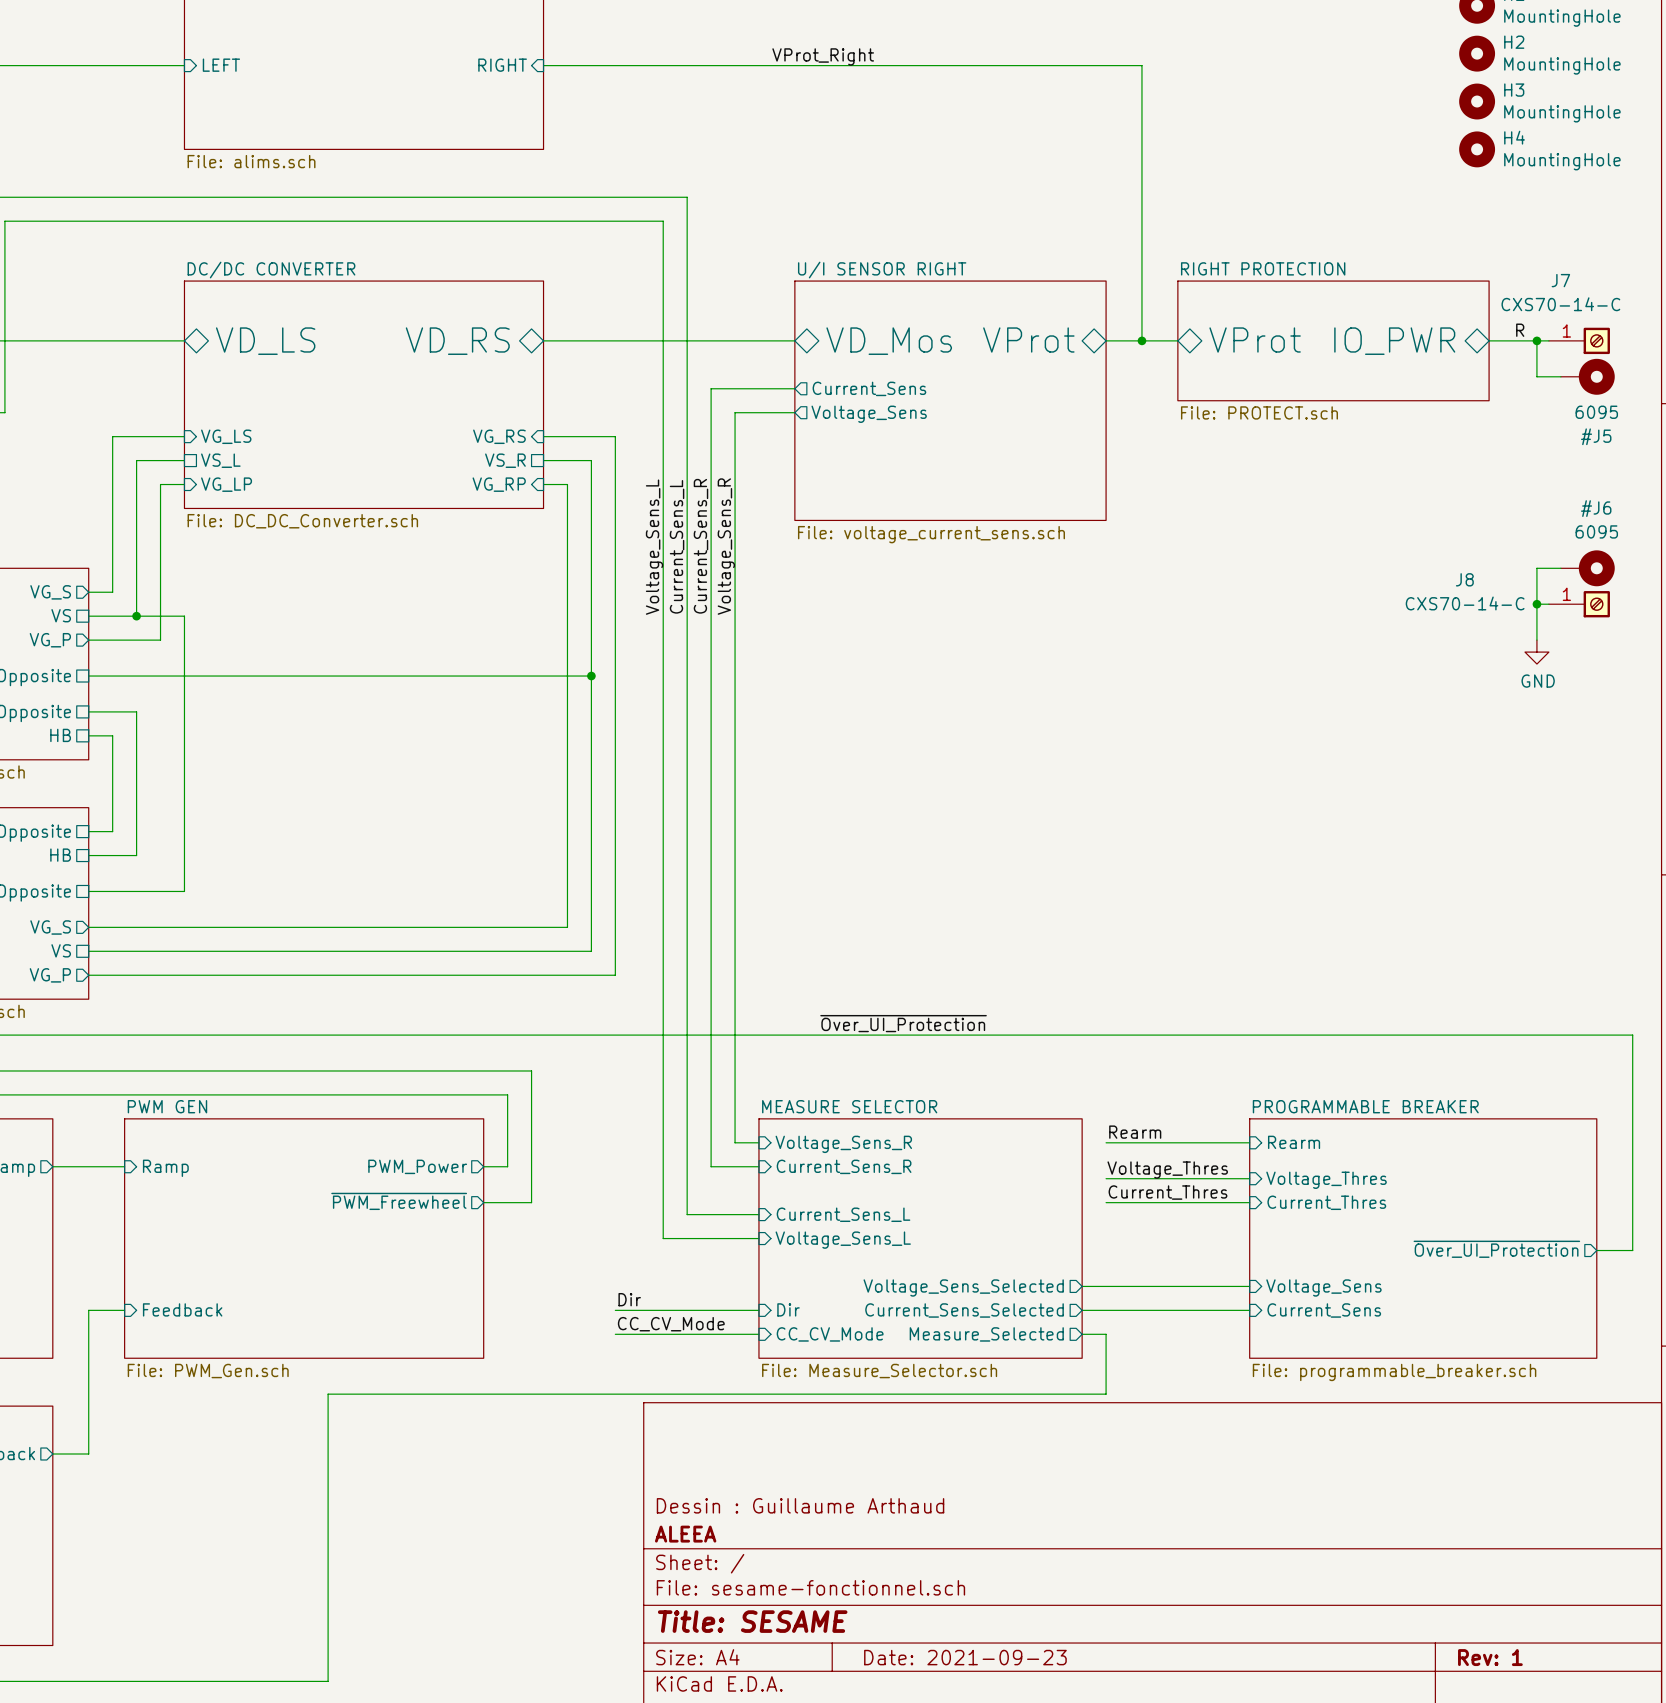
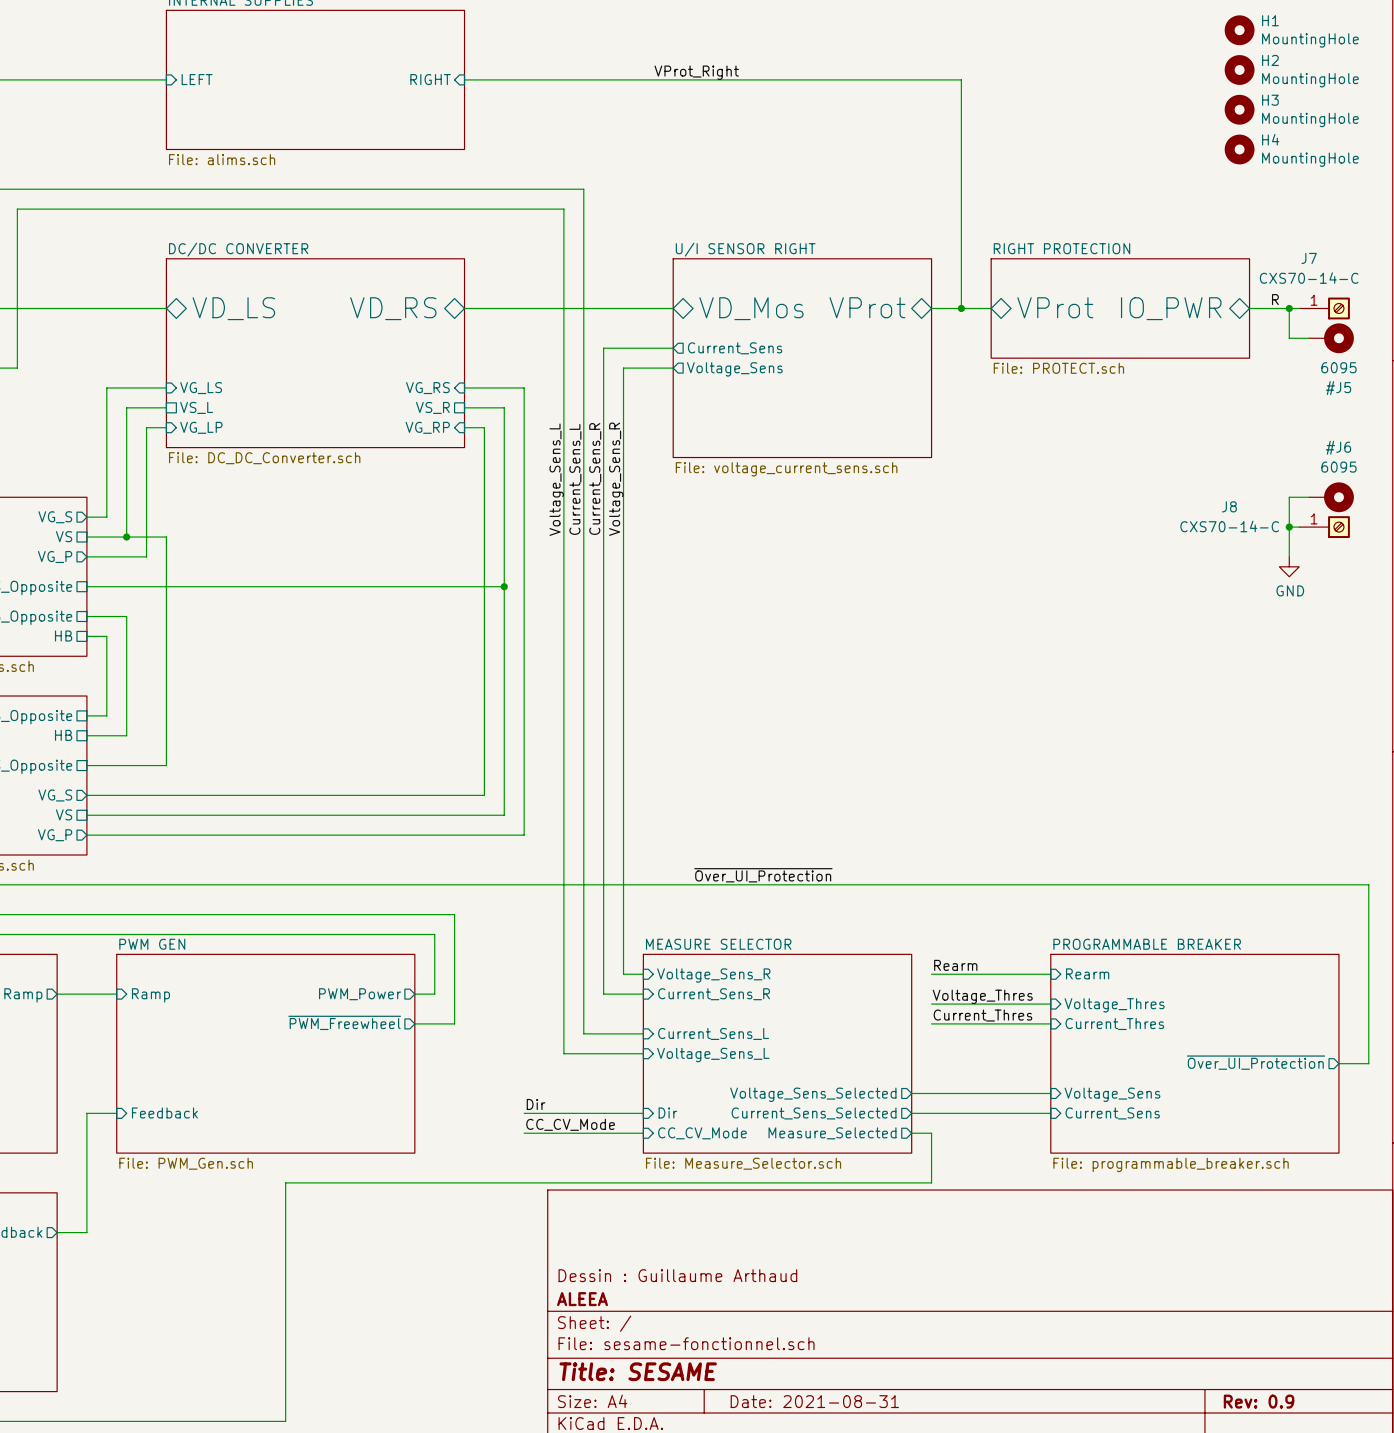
title block: Date: 2021-09-23 (965, 1657) -> Date: 2021-08-31 (814, 1401)
title block: Rev: 1 (1490, 1657) -> Rev: 0.9 (1259, 1401)

